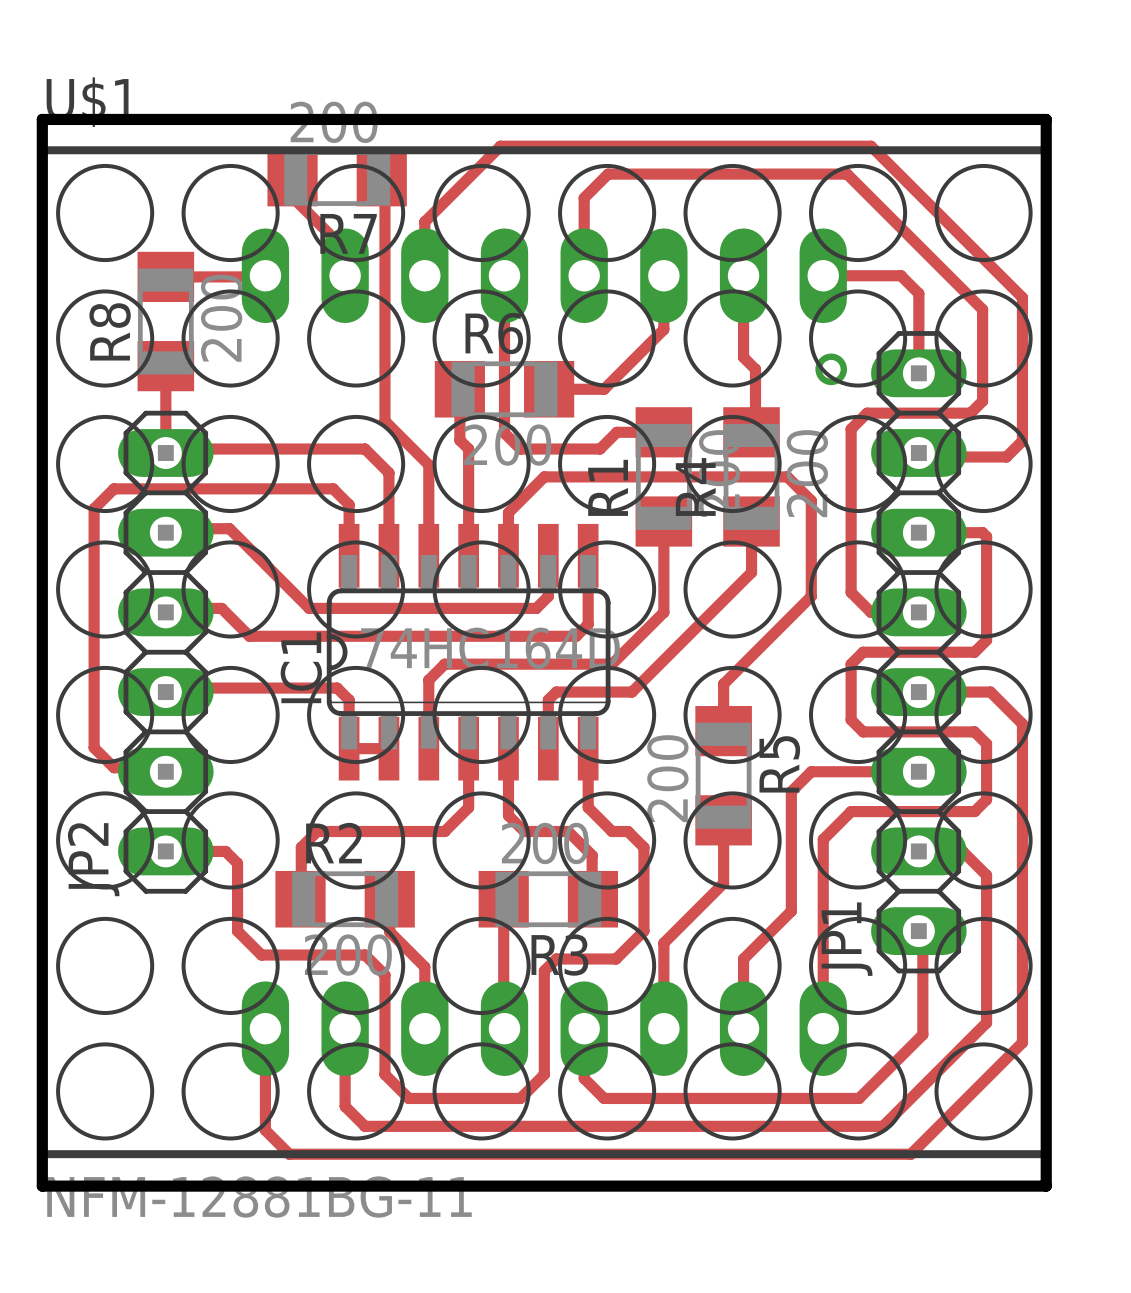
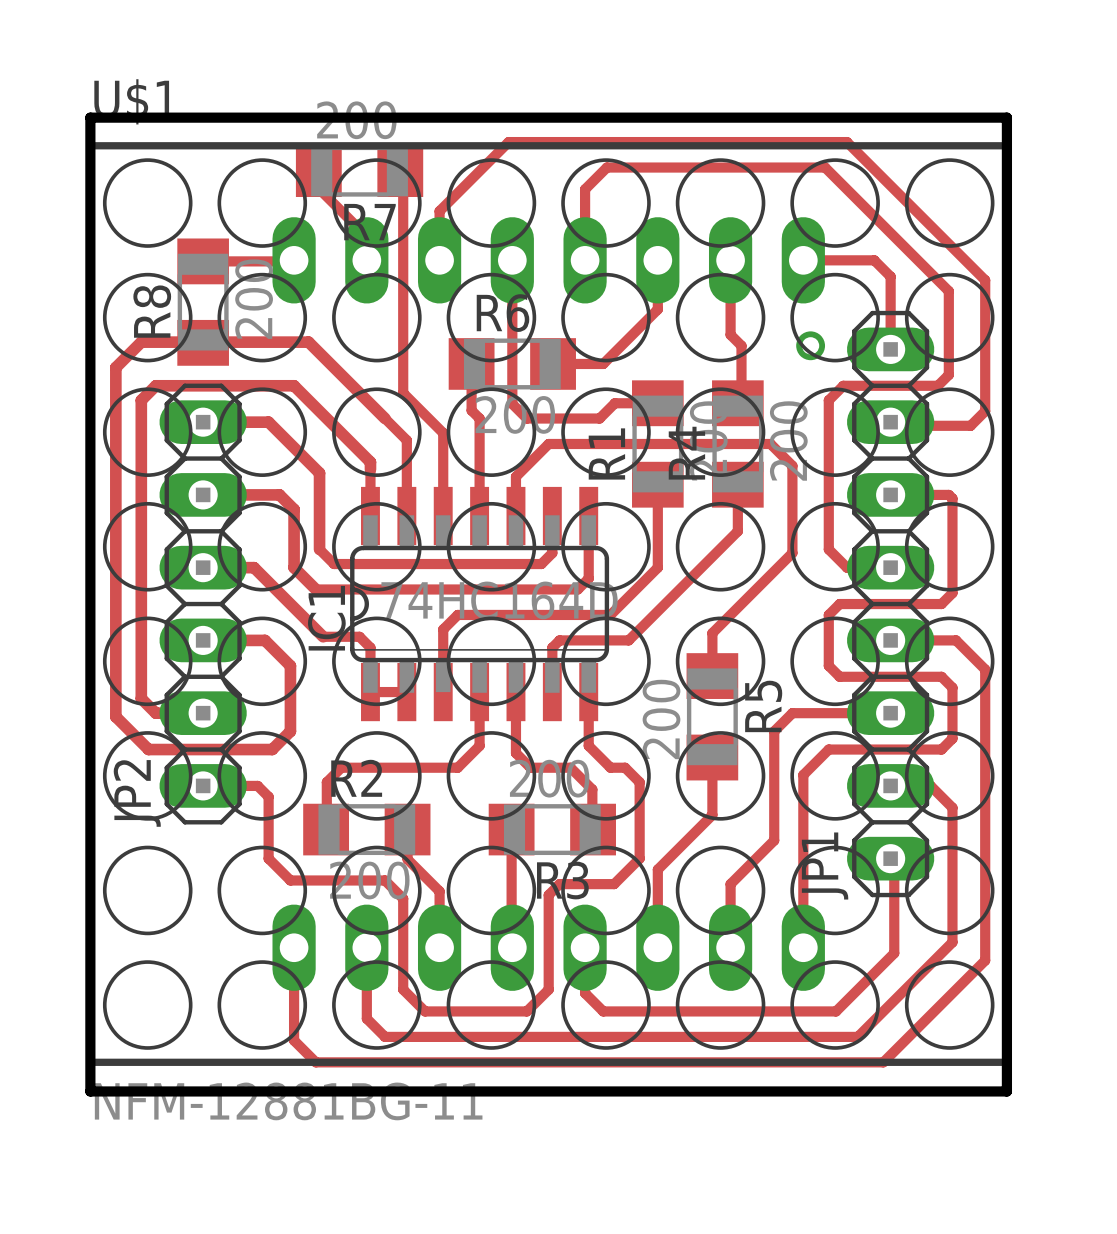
track: (165, 366) (165, 453) (169, 449) (365, 449) -> none
track: none -> (203, 422) (268, 422) (319, 473) (319, 549)
track: (349, 504) (333, 488) (114, 488) (94, 508) (94, 747) (114, 767) (161, 767) (165, 771) -> (370, 469) (370, 462) (294, 385) (155, 385) (141, 400) (141, 698) (155, 713) (203, 713)
track: (165, 532) (169, 528) (229, 528) (293, 592) -> (203, 494) (279, 494) (294, 509) (294, 567) (315, 589)
track: (165, 612) (169, 608) (221, 608) (249, 636) (289, 636) -> (203, 567) (254, 567) (323, 636)
track: (297, 688) (169, 688) (165, 692) -> (385, 418) (308, 342) (141, 342) (115, 367) (115, 716) (148, 749) (272, 749) (290, 731) (290, 665) (264, 640) (203, 640)

